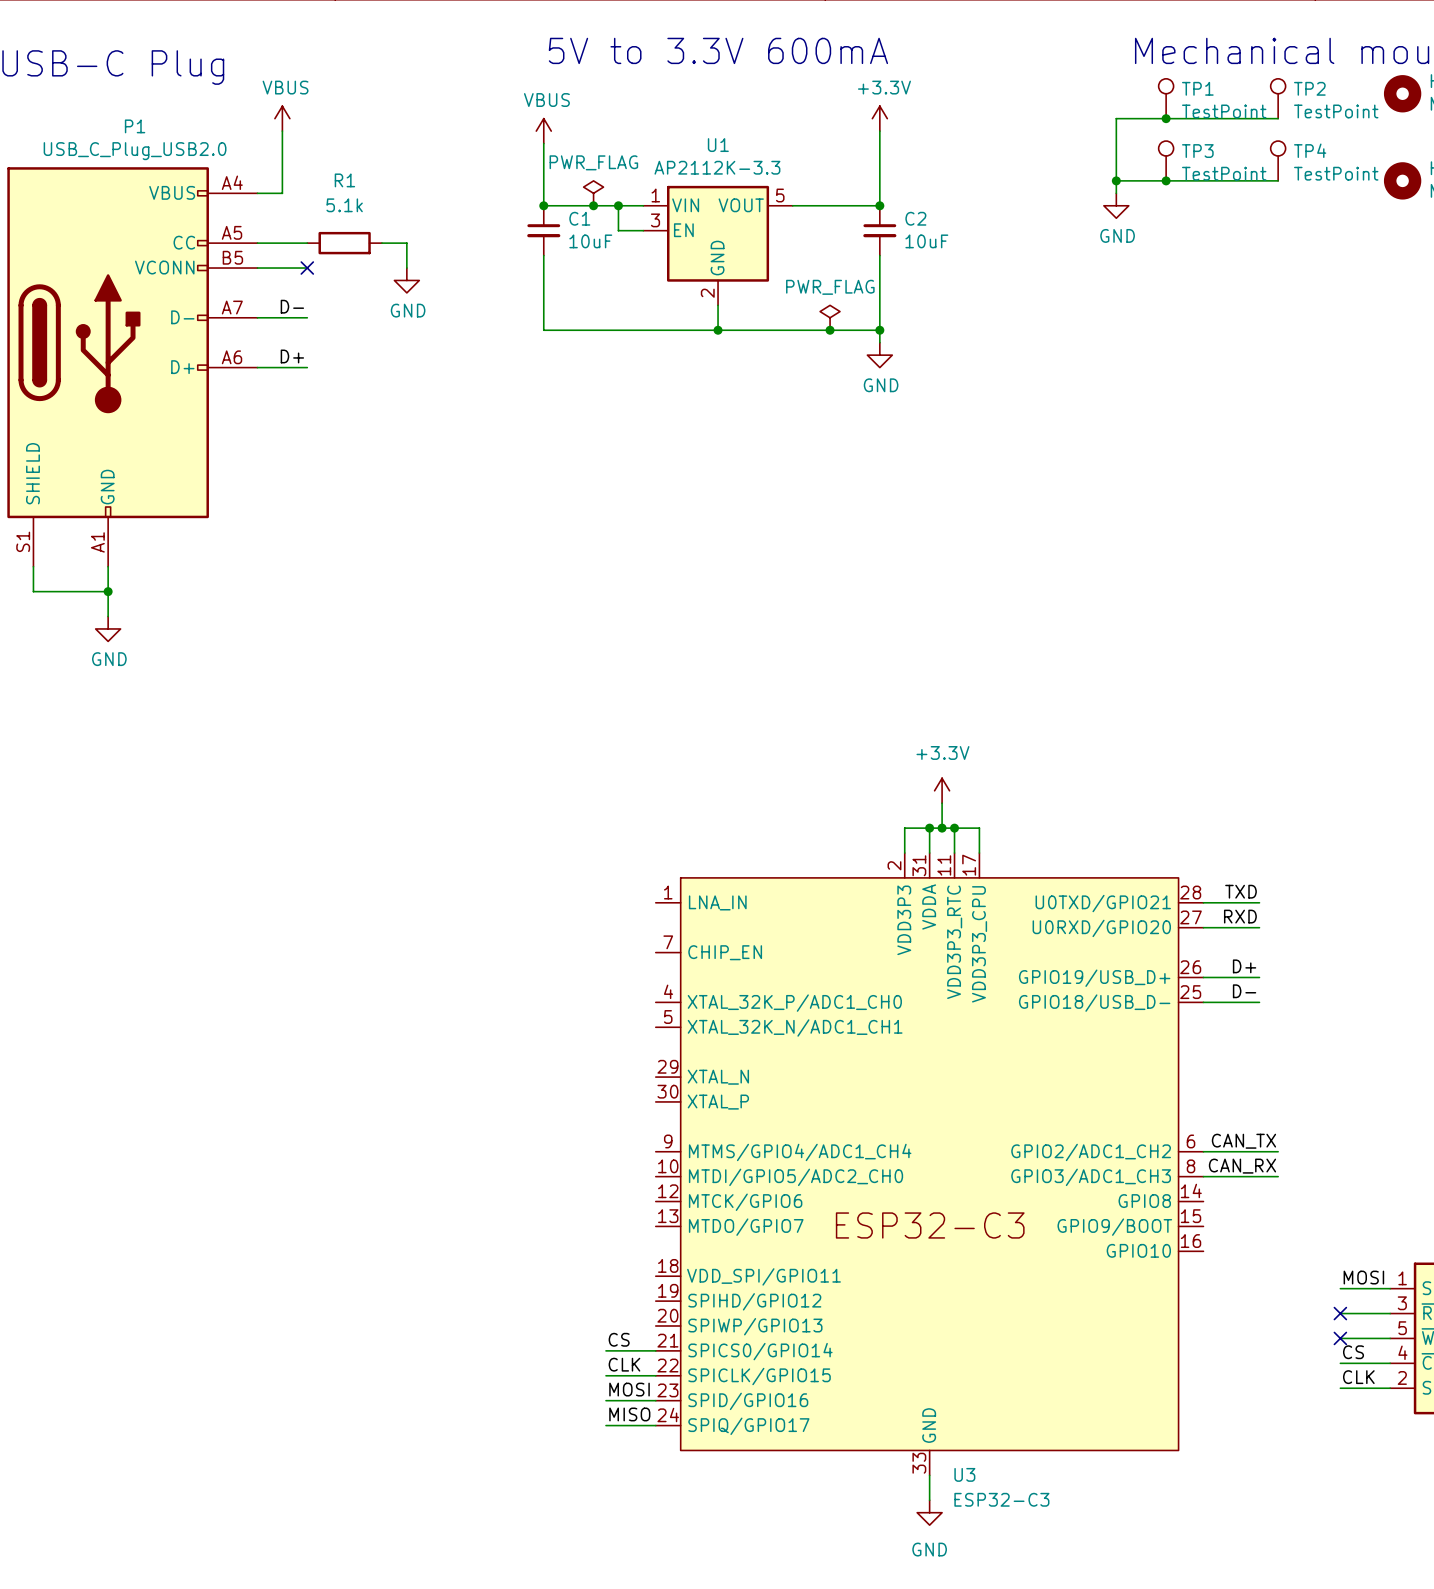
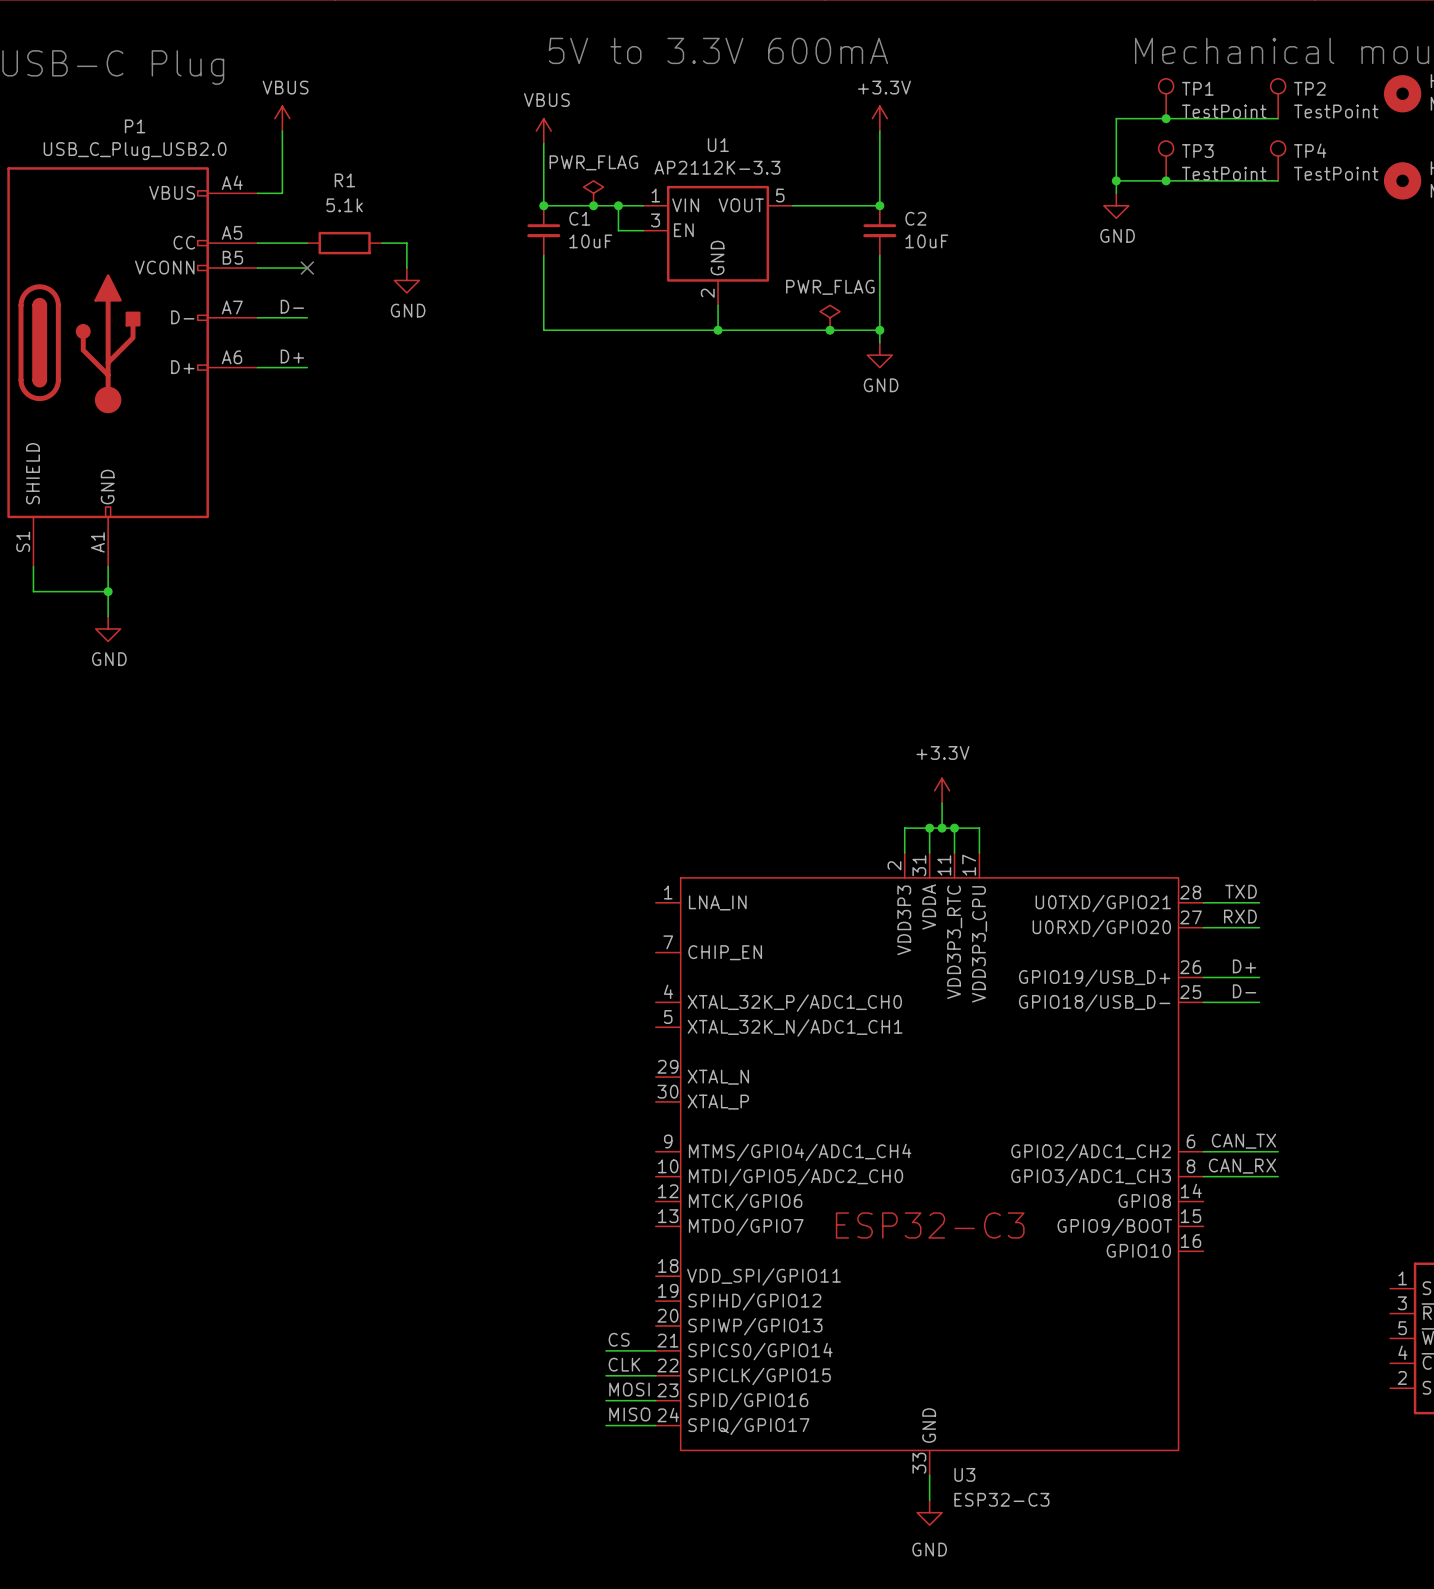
label: MOSI (1363, 1277) -> none
wire: (1340, 1288) (1390, 1288) -> none
wire: (1340, 1313) (1390, 1313) -> none
no-connect mark: (1340, 1313) -> none
wire: (1340, 1338) (1390, 1338) -> none
no-connect mark: (1340, 1338) -> none
label: CS (1353, 1352) -> none
wire: (1340, 1363) (1390, 1363) -> none
label: CLK (1358, 1377) -> none
wire: (1340, 1388) (1390, 1388) -> none

